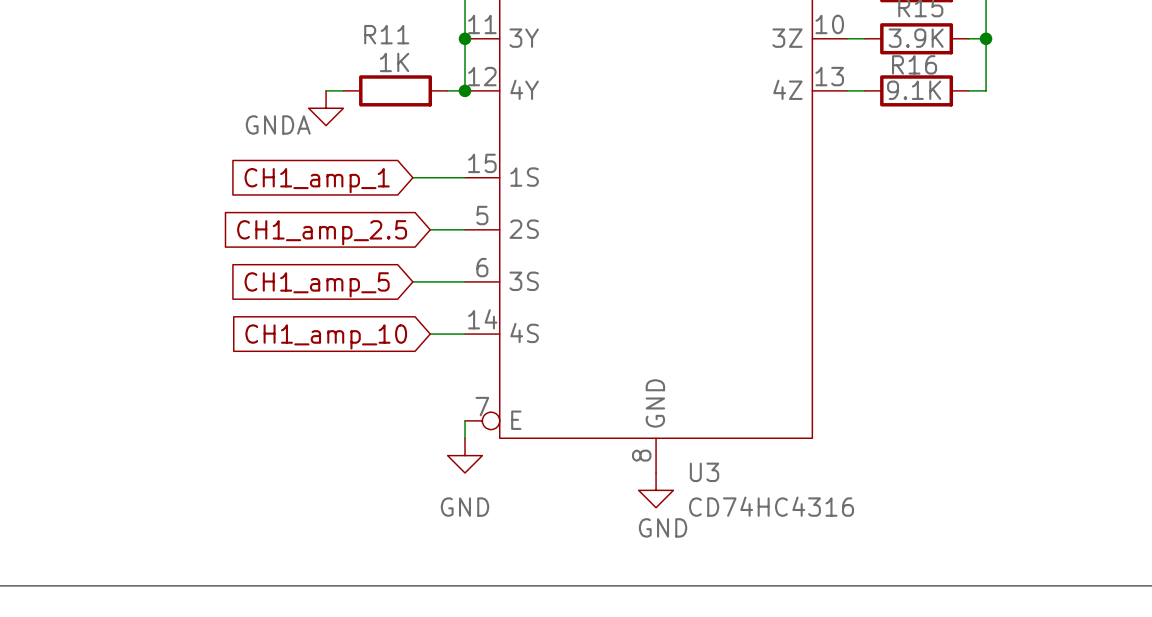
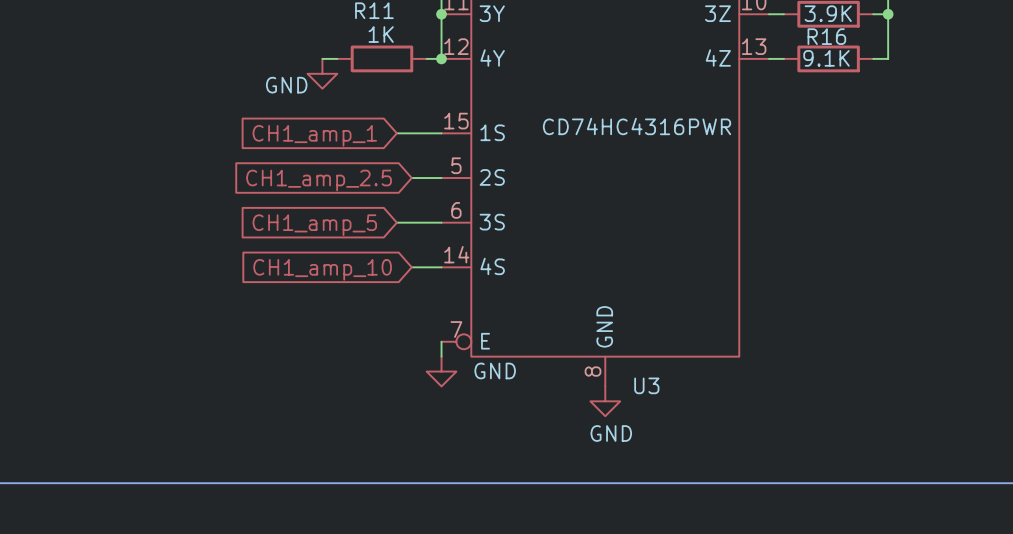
power symbol: GNDA (326, 108) -> GND (322, 73)
U3 value: CD74HC4316 (771, 506) -> CD74HC4316PWR (637, 126)
power symbol text position: GND (465, 507) -> GND (495, 370)

